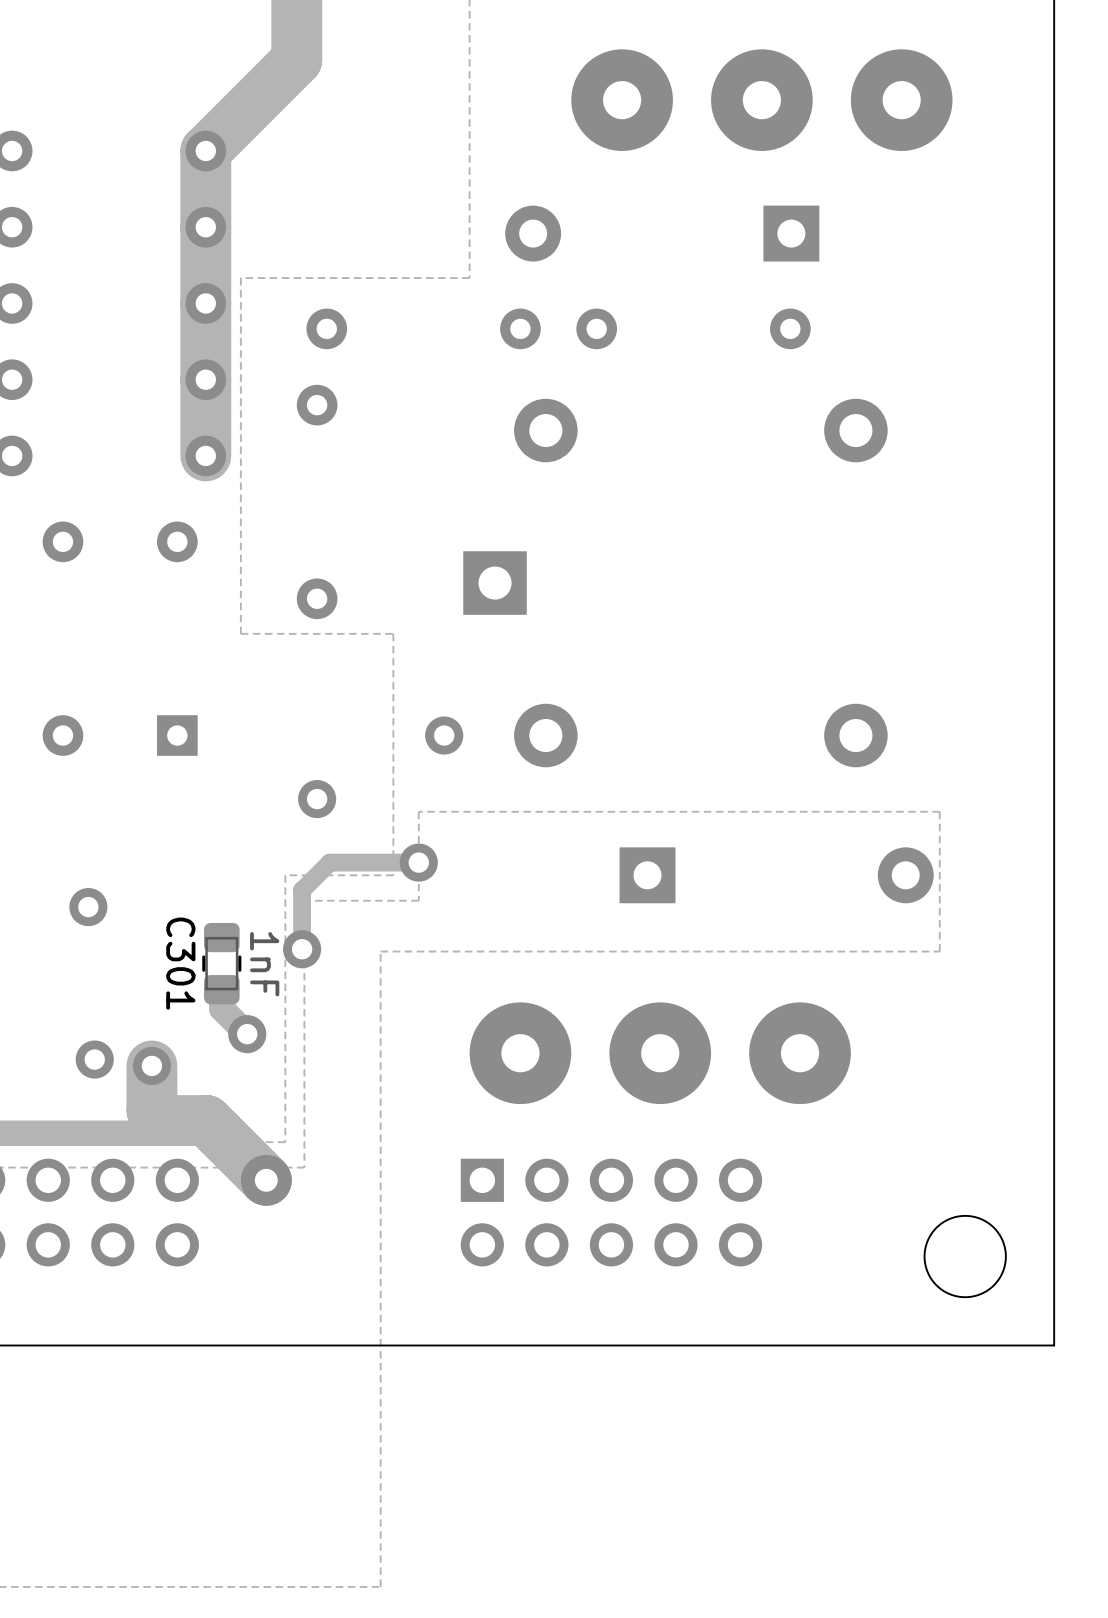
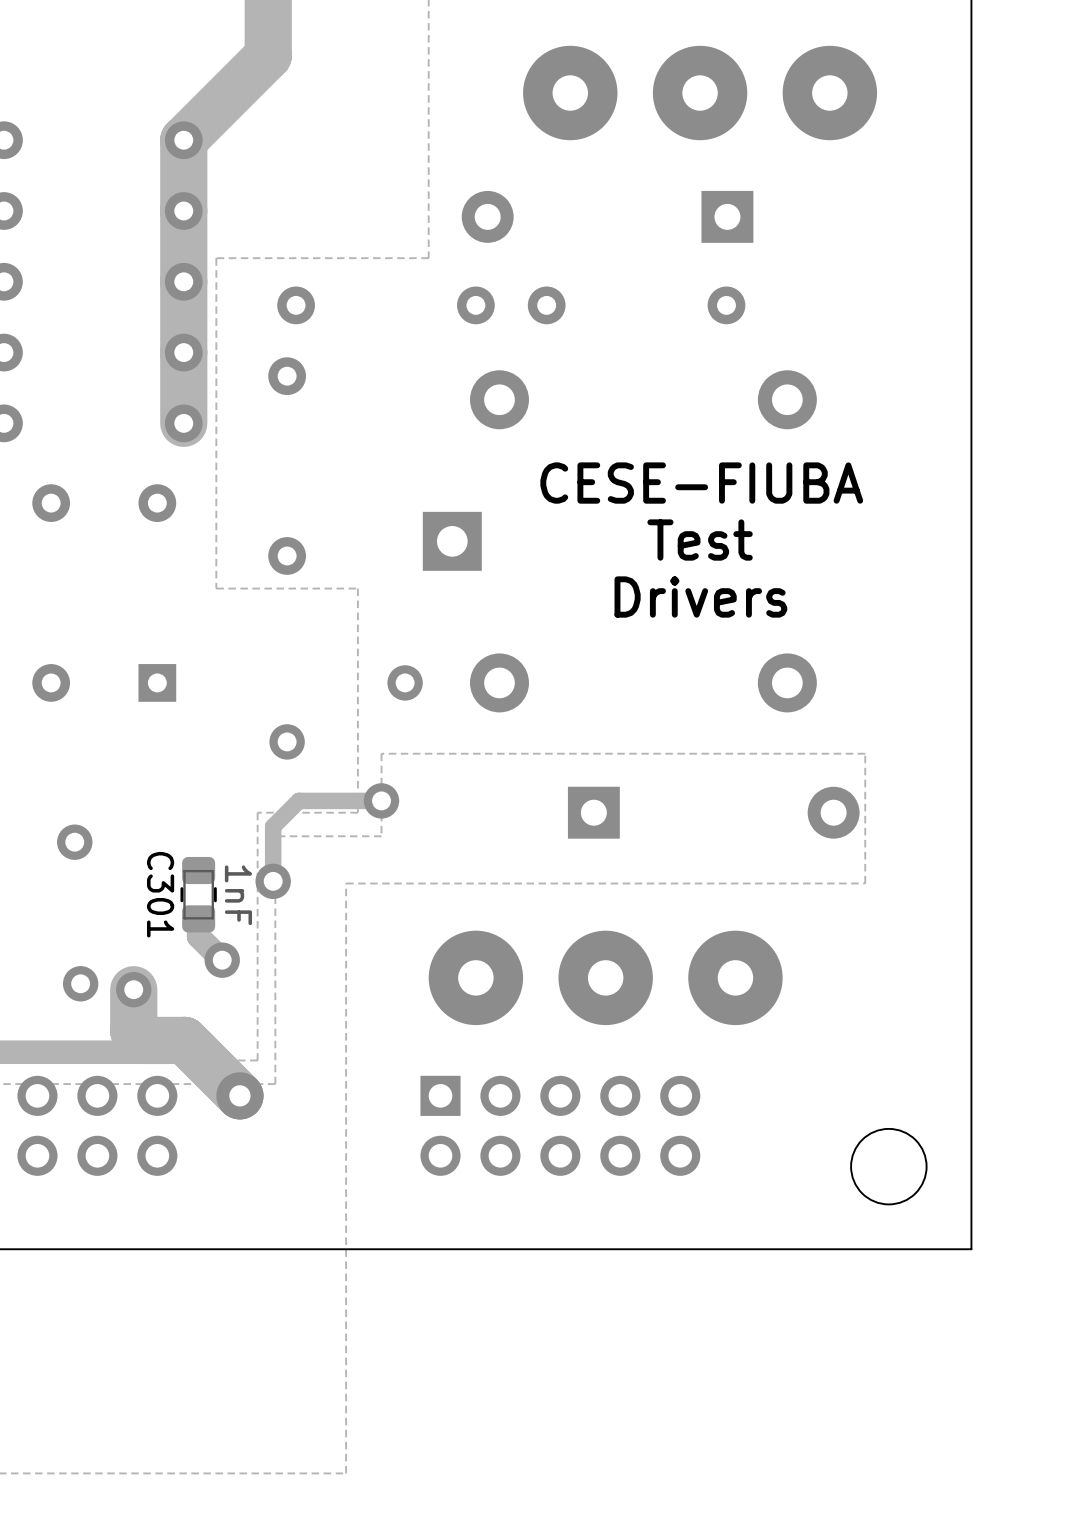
text: none -> CESE-FIUBA (701, 483)
text: none -> Test (700, 540)
text: none -> Drivers (700, 597)

